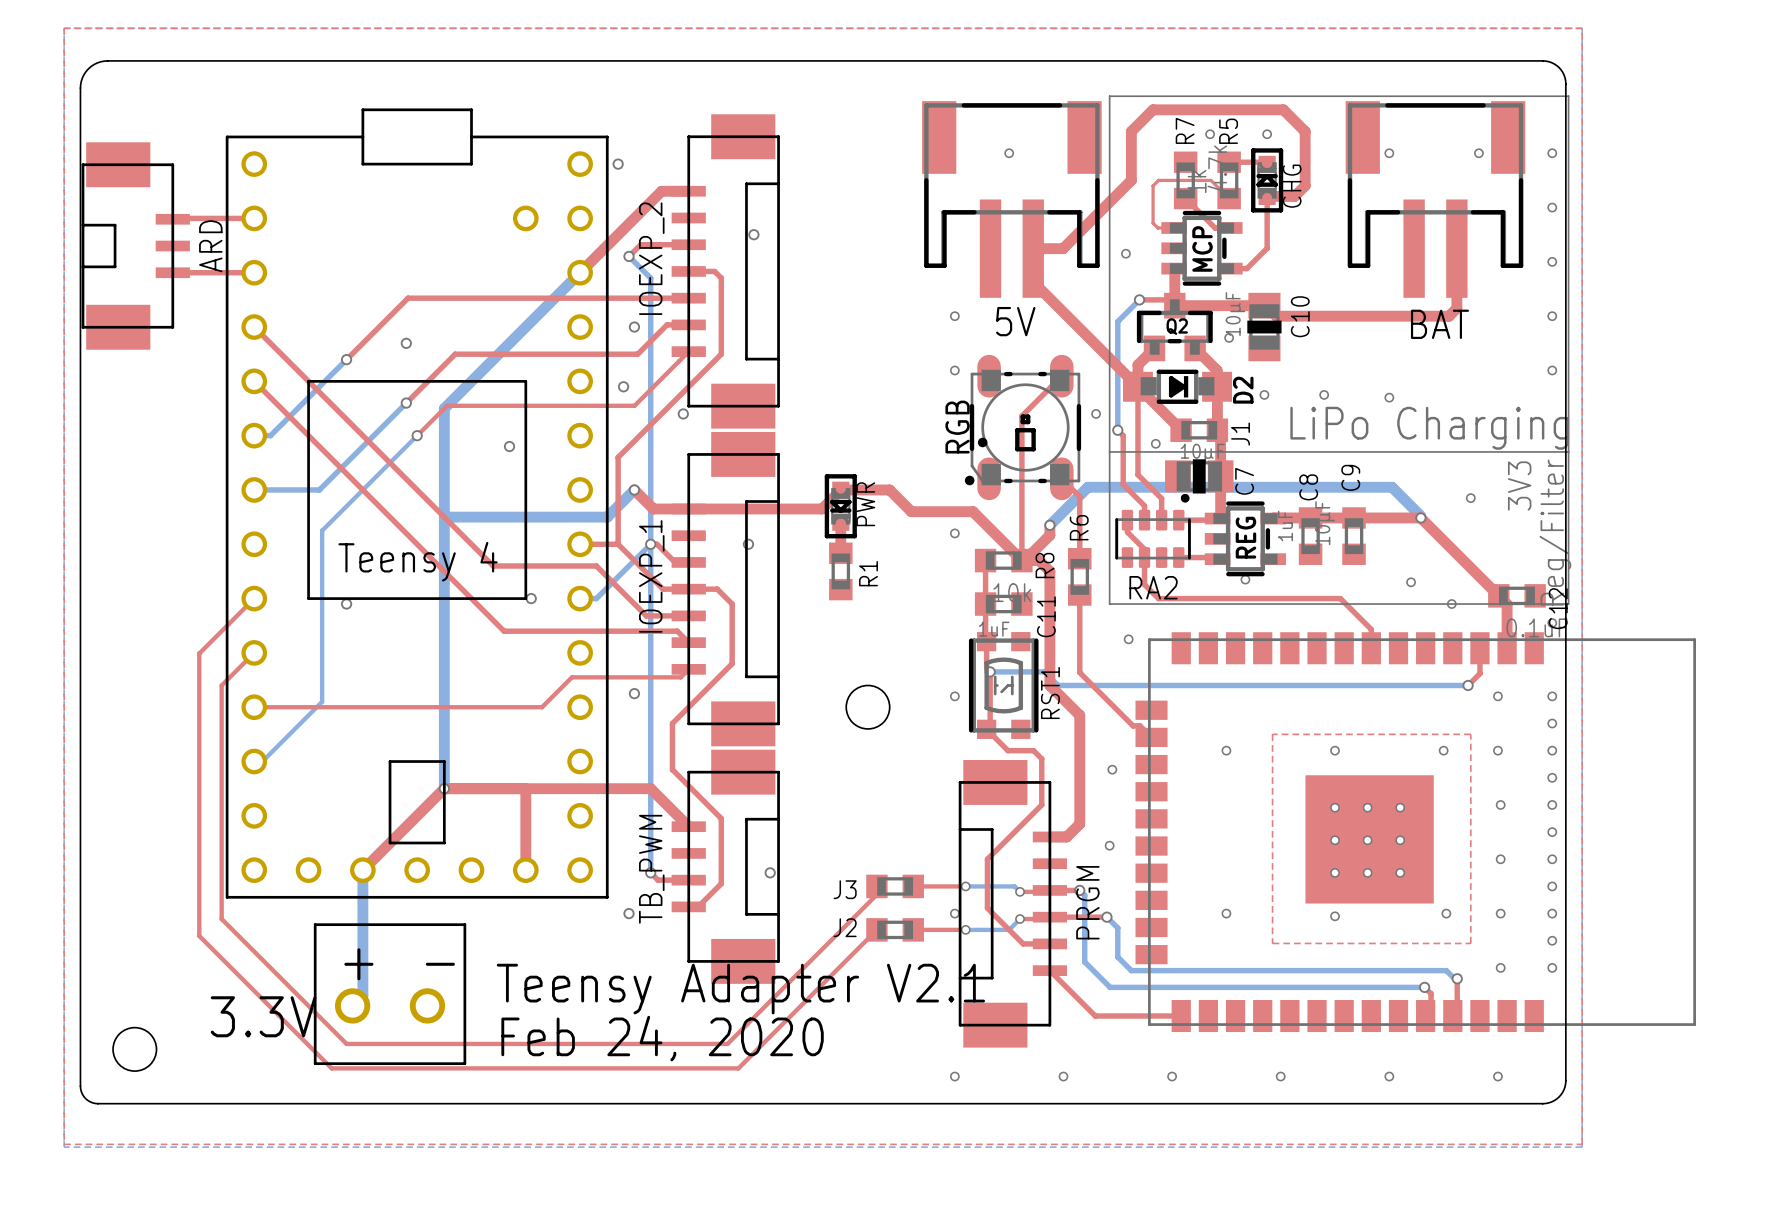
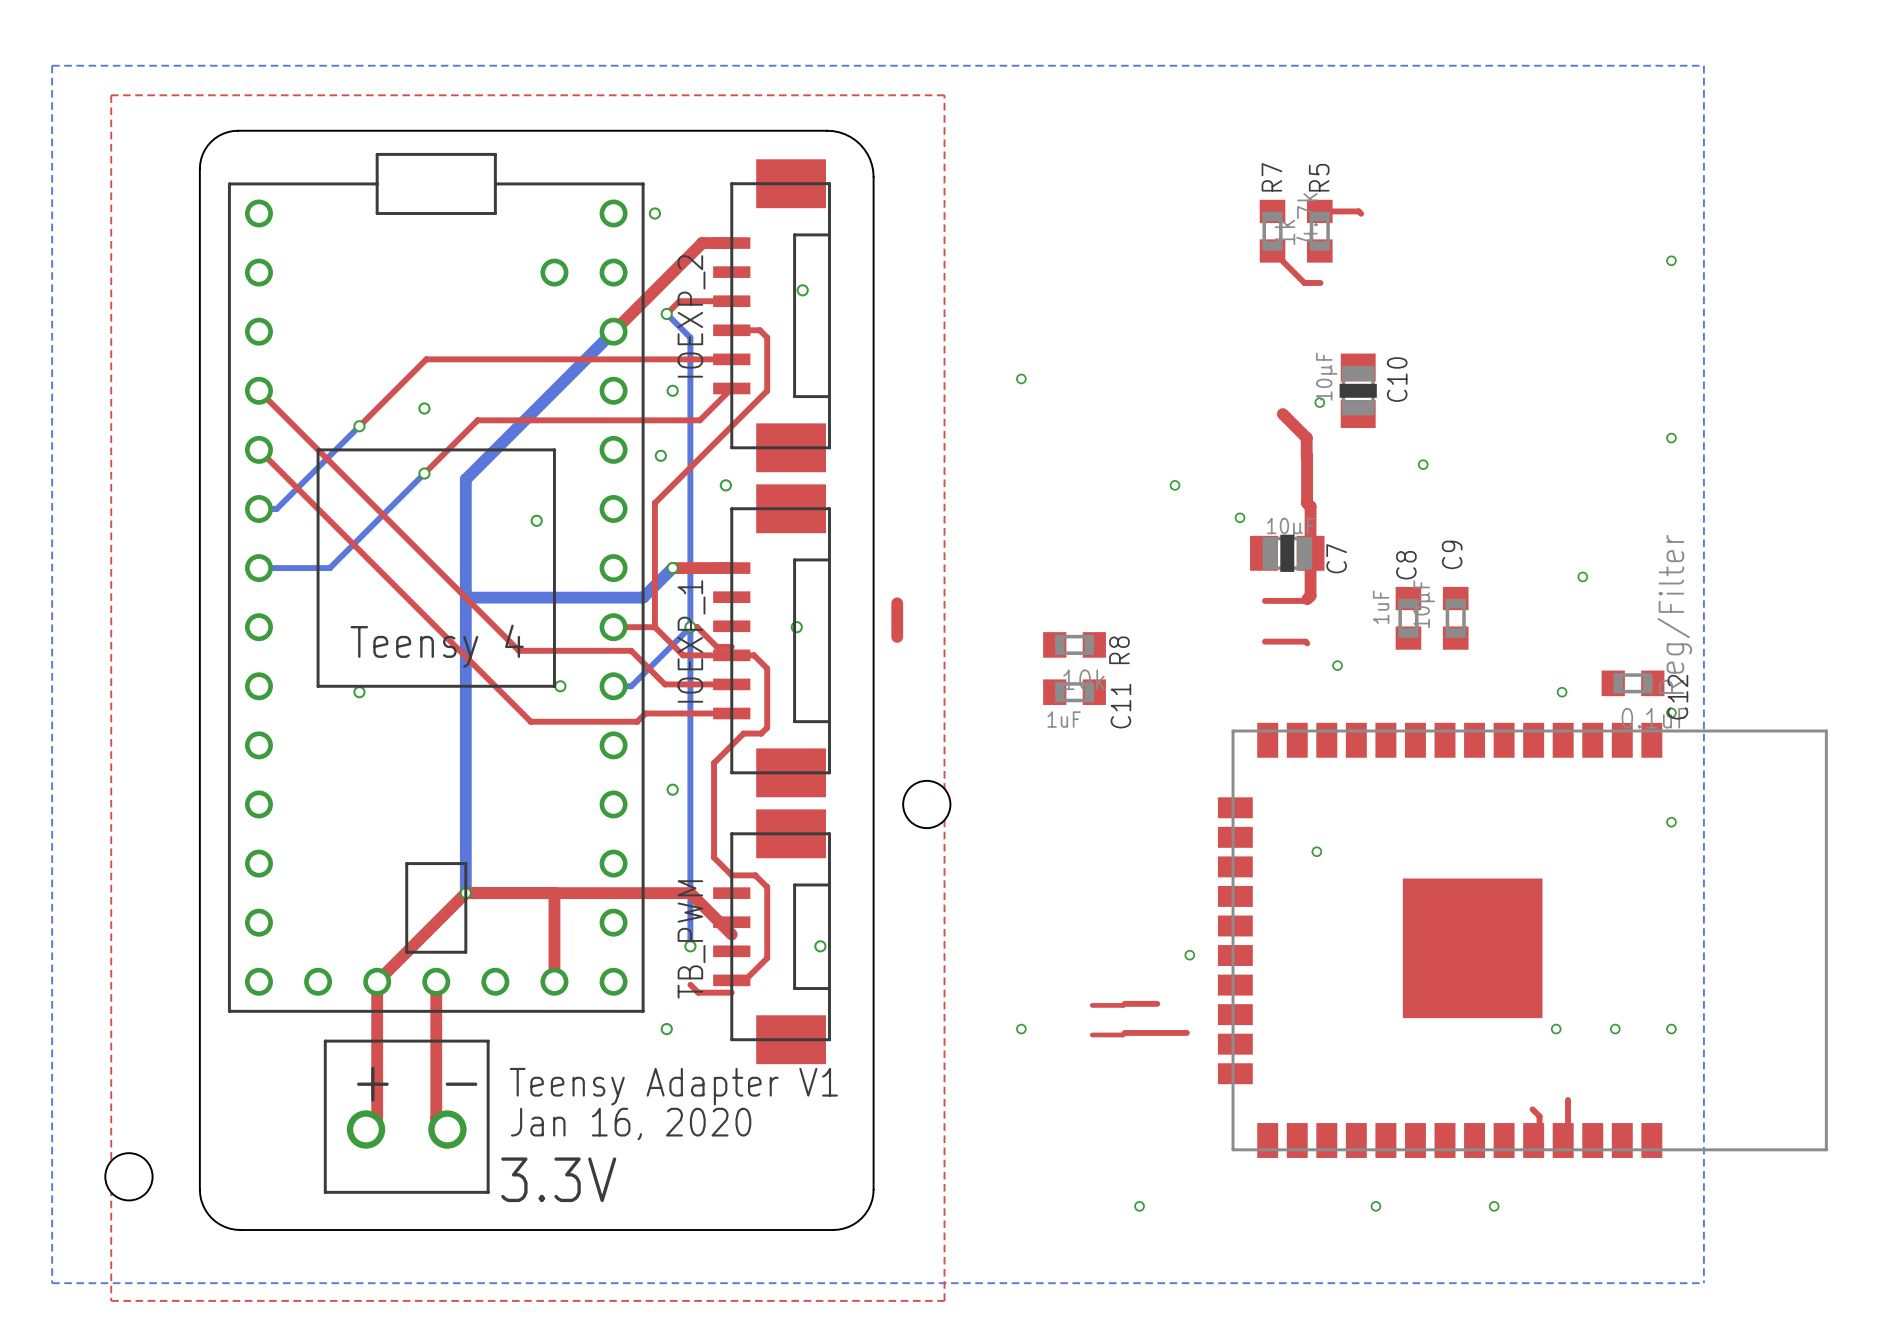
top zone outline: (64, 28) (64, 1144) (1582, 1144) (1582, 28) (64, 28) -> none
top zone outline: none -> (111, 95) (111, 1300) (944, 1300) (944, 95) (111, 95)
board edge: (107, 60) (1542, 60) (1556, 65) (1564, 75) (1565, 83) (1565, 1080) (1561, 1094) (1551, 1101) (1542, 1103) (97, 1103) (87, 1100) (81, 1092) (80, 1086) (80, 88) (82, 77) (88, 68) (97, 62) (107, 60) -> none
board edge: none -> (237, 130) (827, 130) (839, 132) (850, 136) (860, 144) (867, 153) (872, 165) (873, 177) (873, 1189) (868, 1209) (853, 1224) (833, 1229) (240, 1229) (220, 1224) (205, 1209) (199, 1189) (199, 168) (202, 154) (211, 141) (223, 133) (237, 130)
line: (1109, 96) (1568, 96) (1568, 604) (1109, 604) (1109, 96) -> none
IOEXP_2 footprint: [671, 114, 780, 429] -> [713, 159, 831, 473]
via: (1210, 134) -> none
via: (1267, 134) -> none
via: (1009, 153) -> none
via: (1389, 153) -> none
via: (1478, 153) -> none
via: (1552, 153) -> none
CHG: (1267, 180) -> none
top track: (1229, 198) (1210, 180) (1158, 180) (1153, 185) (1153, 223) (1157, 227) (1174, 227) -> none
5V: (1011, 199) -> none
BAT: (1435, 199) -> none
top track: (254, 218) (172, 219) -> none
ARD: (135, 246) -> none
MCP: (1201, 248) -> none
top track: (1456, 248) (1456, 308) (1449, 316) (1276, 316) (1265, 304) (1174, 305) -> none
via: (1125, 253) -> none
via: (1552, 261) -> none
top track: (1174, 268) (1174, 305) -> none
top track: (1229, 268) (1246, 268) (1267, 248) (1267, 196) (1294, 196) (1305, 185) (1305, 131) (1283, 109) (1153, 109) (1131, 131) (1131, 180) (1063, 248) (1033, 248) (1033, 282) (1181, 429) -> none
top track: (172, 272) (254, 272) -> none
bottom track: (1139, 299) (1117, 321) (1117, 430) -> none
top track: (1139, 299) (1169, 299) (1174, 305) -> none
via: (1139, 299) -> none
via: (1552, 316) -> none
top track: (688, 324) (667, 324) (637, 354) -> (731, 388) (699, 420) (676, 420)
top track: (721, 327) (721, 354) (618, 457) -> (767, 390) (654, 503) (654, 532)
Q2: (1174, 327) -> none
top track: (1154, 348) (1137, 364) (1137, 474) (1161, 498) (1161, 520) -> none
top track: (688, 351) (634, 405) (447, 405) (417, 435) -> none
via: (954, 370) -> none
top track: (1061, 376) (1021, 416) (1021, 560) -> none
D2: (1177, 386) -> none
via: (1264, 394) -> none
via: (1389, 397) -> none
RGB: (1022, 427) -> none
text: LiPo Charging (1429, 428) -> none
top track: (1117, 430) (1123, 435) (1123, 484) (1144, 505) (1144, 520) -> none
via: (1117, 430) -> none
J1: (1199, 430) -> none
IOEXP_1 footprint: [671, 432, 780, 747] -> [713, 484, 831, 798]
bottom track: (417, 435) (322, 530) (322, 701) (262, 761) (254, 761) -> none
via: (417, 435) -> none
line: (1109, 451) (1568, 451) -> none
top track: (1061, 478) (1079, 496) (1079, 558) -> none
text: 3V3 (1519, 485) -> none
top track: (634, 489) (653, 508) (822, 508) (840, 490) -> (672, 568) (731, 568)
top track: (840, 489) (889, 489) (911, 511) (973, 511) (1021, 560) -> none
PWR: (840, 506) -> none
bottom track: (1420, 517) (1392, 487) (1087, 487) (1049, 525) -> none
via: (1420, 517) -> none
top track: (1273, 518) (1420, 517) (1507, 604) (1507, 648) -> none
top track: (1127, 520) (1127, 532) (1144, 549) (1144, 584) (1158, 598) (1340, 598) (1371, 629) (1371, 648) -> none
top track: (1049, 525) (1049, 535) (1024, 560) (1021, 560) -> none
via: (1049, 525) -> none
RA2: (1153, 530) -> none
via: (954, 533) -> none
REG: (1245, 538) -> none
top track: (985, 560) (986, 668) (990, 671) (990, 725) (986, 729) (1007, 750) (1033, 750) (1041, 758) (1041, 804) (987, 859) (987, 908) (1023, 943) (1049, 943) -> none
top track: (1021, 560) (1039, 560) (1049, 571) (1049, 685) (1079, 715) (1079, 823) (1066, 836) (1049, 836) -> none
top track: (644, 570) (663, 589) (717, 589) (732, 604) (732, 663) (672, 723) -> (683, 655) (754, 655) (767, 668) (767, 727) (761, 733) (743, 733) (714, 763) (714, 822)
R1: (840, 571) -> none
R6: (1079, 576) -> none
via: (1411, 582) -> none
top track: (1079, 595) (1079, 672) (1133, 725) (1139, 725) (1151, 737) -> none
top track: (627, 596) (646, 615) (688, 615) -> (664, 684) (731, 684)
top track: (254, 598) (199, 653) (199, 935) (331, 1068) (738, 1068) (876, 929) -> none
top track: (601, 631) (677, 631) (688, 642) -> (637, 721) (645, 713) (731, 713)
via: (1128, 639) -> none
top track: (1479, 648) (1479, 673) (1468, 685) -> none
top track: (254, 652) (221, 685) (221, 919) (346, 1043) (727, 1043) (876, 894) (876, 886) -> none
top track: (688, 669) (680, 677) (571, 677) (542, 707) (254, 707) -> none
bottom track: (990, 671) (1044, 671) (1058, 685) (1468, 685) -> none
via: (990, 671) -> none
RST1: (1003, 685) -> none
via: (1468, 685) -> none
via: (954, 696) -> none
via: (1497, 696) -> none
via: (1552, 696) -> none
top zone outline: (1272, 734) (1470, 734) (1470, 943) (1272, 943) (1272, 734) -> none
via: (1335, 750) -> none
via: (1443, 750) -> none
via: (1497, 750) -> none
via: (1552, 750) -> none
top track: (672, 756) (672, 769) (721, 818) -> (714, 857) (731, 875) (755, 875) (767, 887) (767, 925)
via: (1112, 769) -> none
via: (1552, 777) -> none
via: (1500, 804) -> none
via: (1552, 804) -> none
via: (1335, 807) -> none
via: (1367, 807) -> none
via: (1400, 807) -> none
via: (1552, 832) -> none
bottom track: (650, 837) (650, 872) -> none
via: (1335, 840) -> none
via: (1367, 840) -> none
via: (1400, 840) -> none
top track: (721, 848) (721, 883) (698, 906) (688, 906) -> (767, 958) (744, 980) (731, 980)
via: (1500, 859) -> none
via: (1552, 859) -> none
TB_PWM position: (725, 866) -> (772, 936)
bottom track: (362, 870) (362, 995) (352, 1005) -> none
top track: none -> (377, 981) (377, 1118) (366, 1129)
top track: none -> (436, 981) (436, 1118) (447, 1129)
via position: (650, 872) -> (690, 946)
via position: (770, 872) -> (820, 946)
via: (1335, 872) -> none
via: (1367, 872) -> none
via: (1400, 872) -> none
J3: (895, 886) -> none
top track: (913, 886) (965, 886) -> none
bottom track: (965, 886) (1014, 886) (1020, 891) -> none
via: (965, 886) -> none
via: (1552, 886) -> none
bottom track: (1079, 890) (1084, 895) (1084, 961) (1110, 987) (1424, 987) -> none
via: (1079, 890) -> none
via: (1020, 891) -> none
PRGM: (1012, 903) -> none
via: (1226, 913) -> none
via: (1335, 916) -> none
bottom track: (1106, 917) (1117, 928) (1117, 957) (1131, 970) (1446, 970) (1454, 978) (1457, 978) -> none
via: (1106, 917) -> none
bottom track: (1020, 919) (1009, 929) (965, 929) -> none
via: (1020, 919) -> none
J2: (895, 929) -> none
top track: (913, 929) (965, 929) -> none
via: (965, 929) -> none
via: (1552, 940) -> none
text: none -> Teensy Adapter V1 (673, 1086)
via: (1500, 967) -> none
via: (1552, 967) -> none
top track: (1049, 970) (1095, 1016) (1181, 1016) -> none
via: (1457, 978) -> none
via: (1424, 987) -> none
text: Teensy Adapter V2.1 (740, 989) -> Jan 16, 2020 (631, 1124)
text position: 3.3V (263, 1016) -> 3.3V (558, 1179)
text: Feb 24, 2020 (662, 1038) -> none
via: (954, 1076) -> none
via: (1172, 1076) -> none
via: (1497, 1076) -> none

